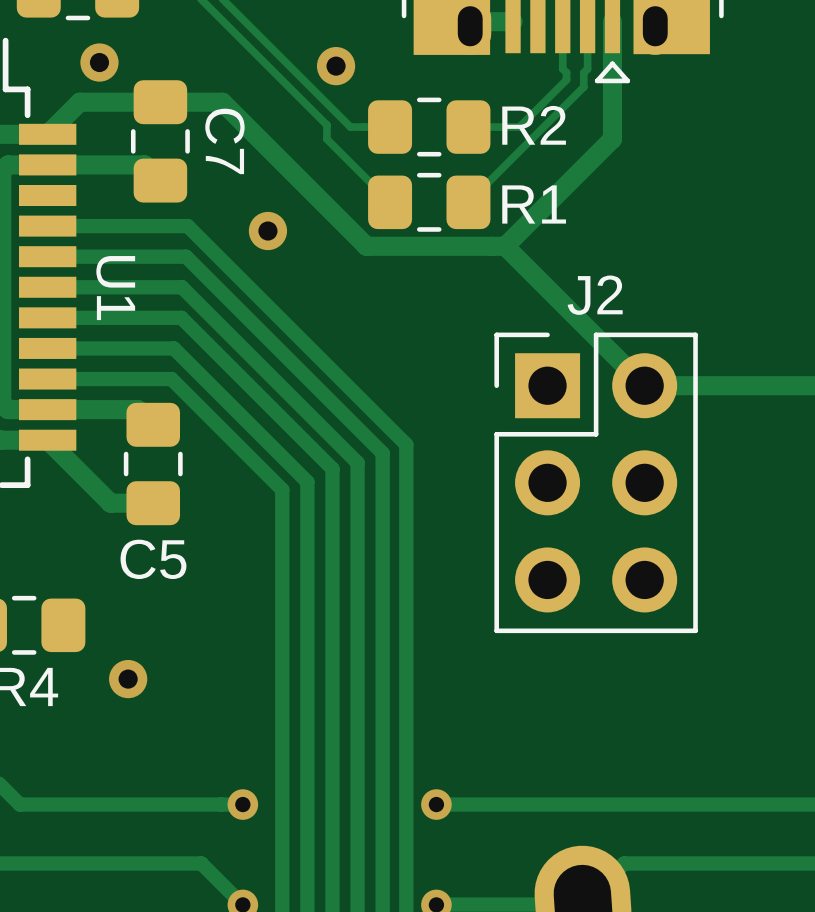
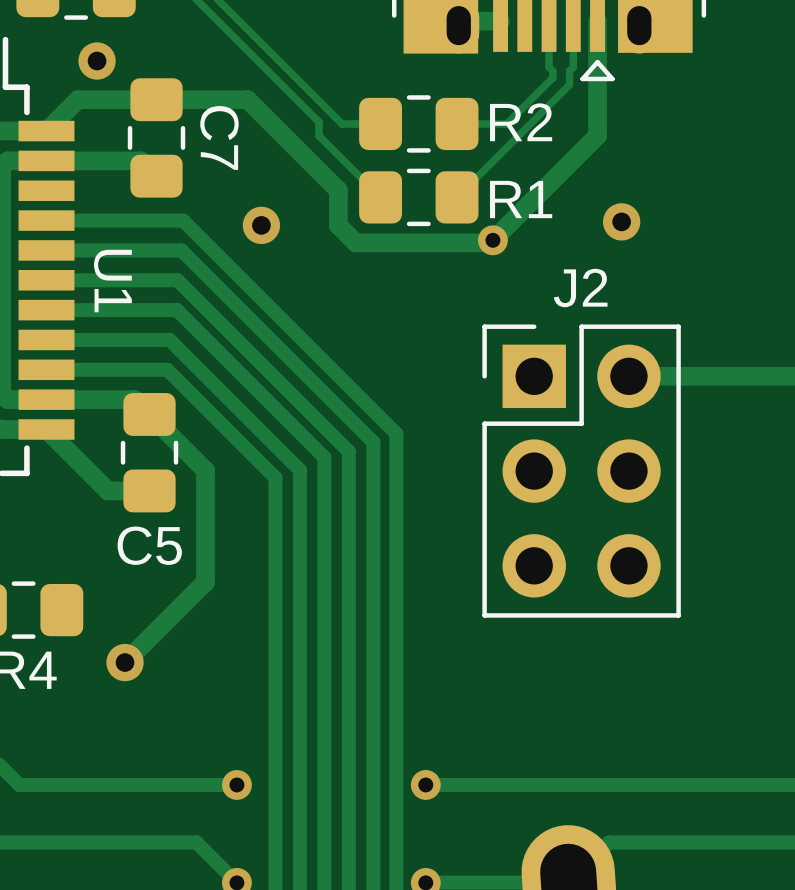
via: (336, 66) -> none
track: (222, 102) (366, 246) (505, 246) (644, 385) -> (217, 99) (247, 99) (338, 190) (338, 225) (355, 242) (490, 242) (492, 240)
via: none -> (621, 221)
via: none -> (492, 240)
track: none -> (149, 414) (205, 470) (205, 582) (125, 662)

